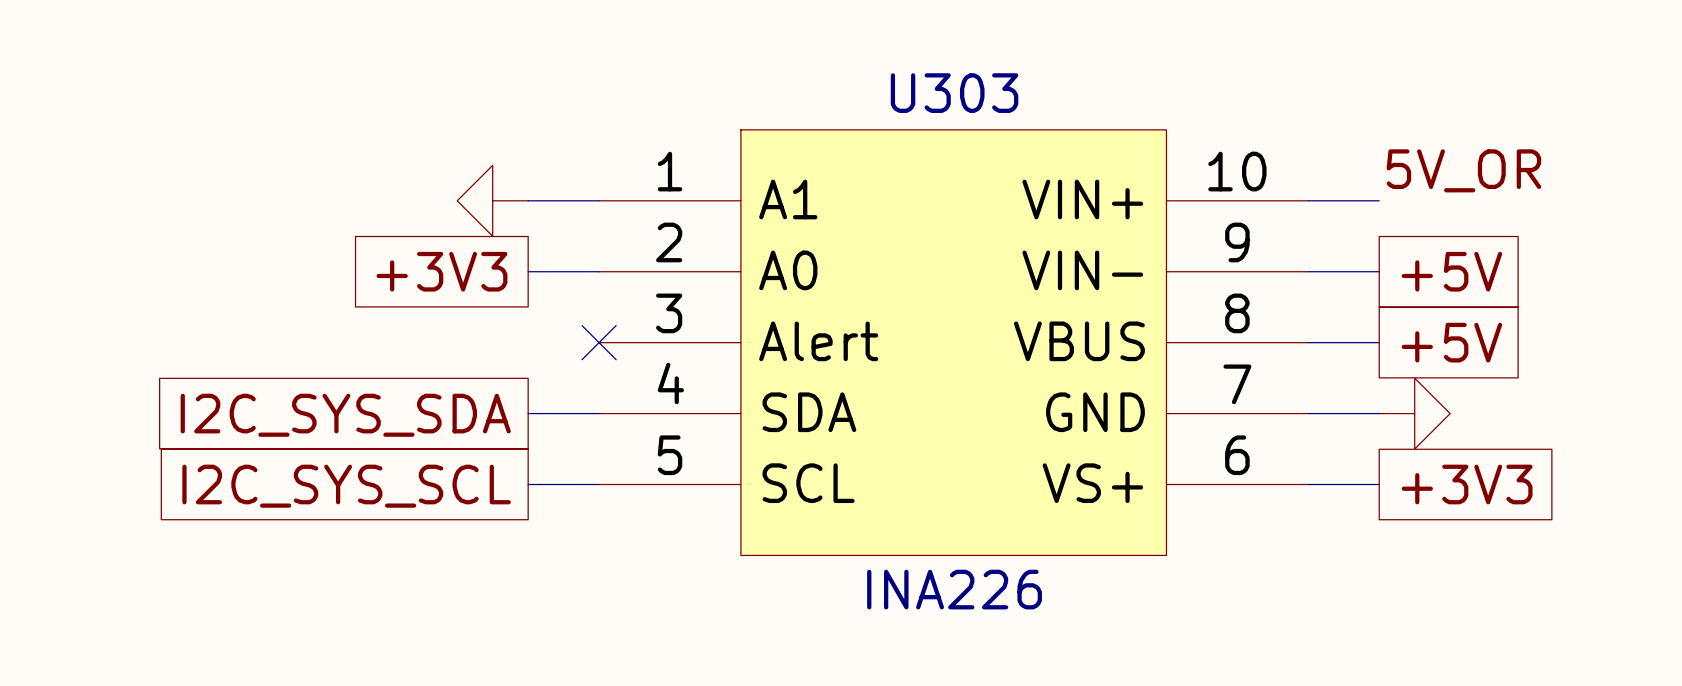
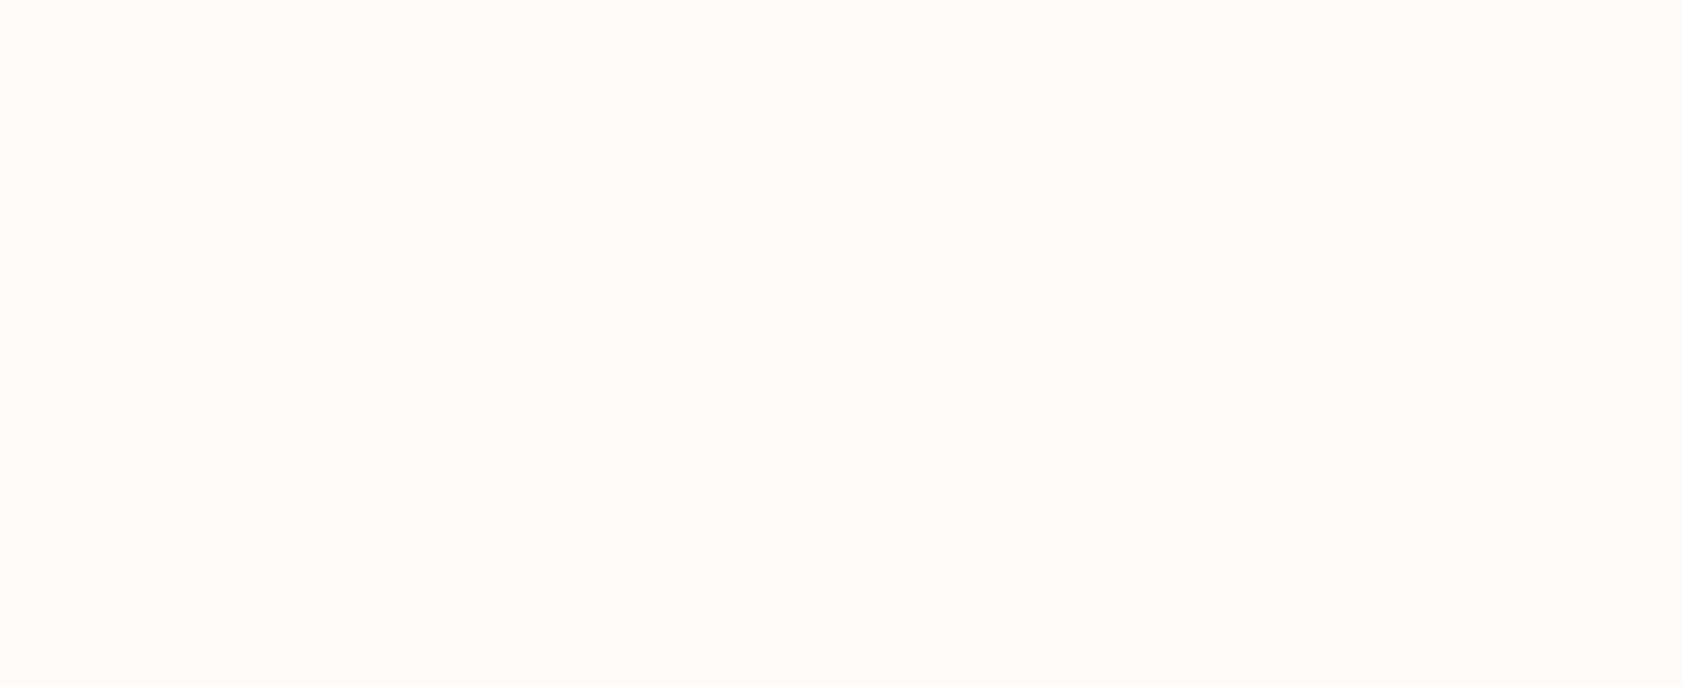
label: 5V_OR (1463, 170) -> none
power symbol: (492, 200) -> none
wire: (528, 200) (599, 200) -> none
wire: (1308, 200) (1379, 200) -> none
global label: +3V3 (441, 271) -> none
wire: (528, 271) (599, 271) -> none
wire: (1308, 271) (1379, 271) -> none
global label: +5V (1451, 271) -> none
no-connect mark: (599, 342) -> none
U303: INA226 (953, 342) -> none
wire: (1308, 342) (1379, 342) -> none
global label: +5V (1451, 342) -> none
wire: (528, 413) (599, 413) -> none
wire: (1308, 413) (1379, 413) -> none
power symbol: (1414, 413) -> none
global label: I2C_SYS_SDA (345, 415) -> none
wire: (528, 484) (599, 484) -> none
wire: (1308, 484) (1379, 484) -> none
global label: +3V3 (1467, 484) -> none
global label: I2C_SYS_SCL (346, 486) -> none

